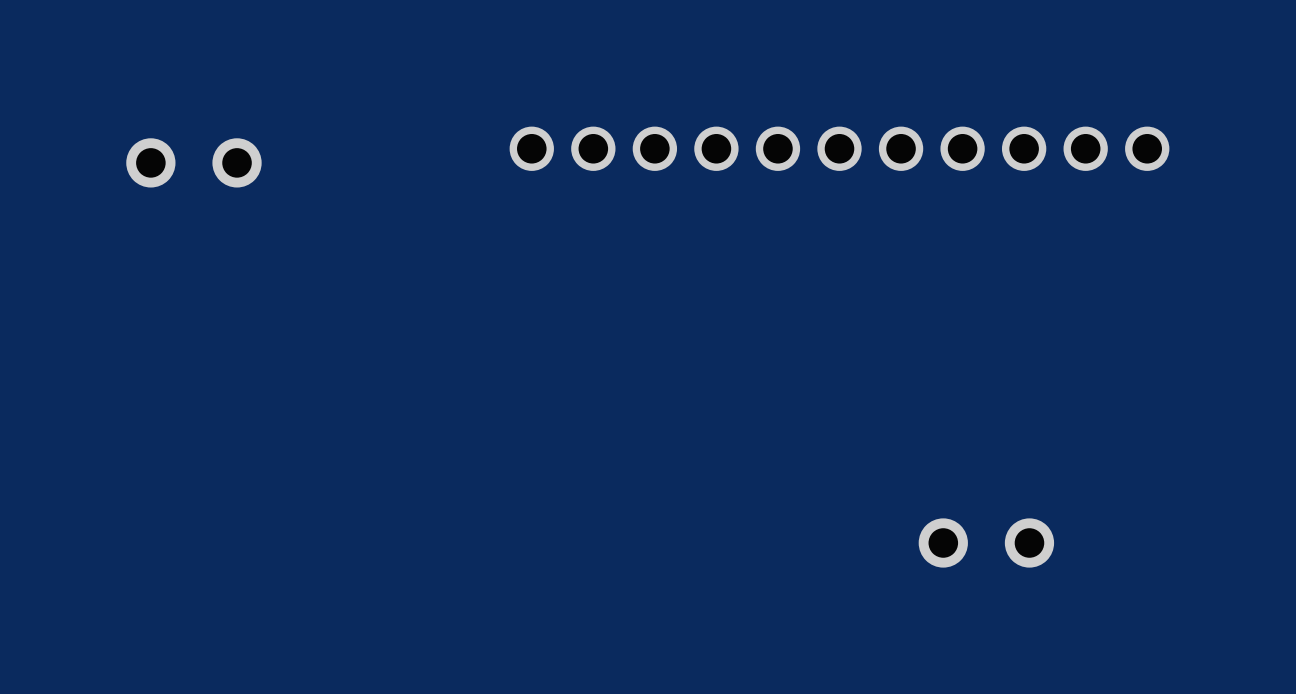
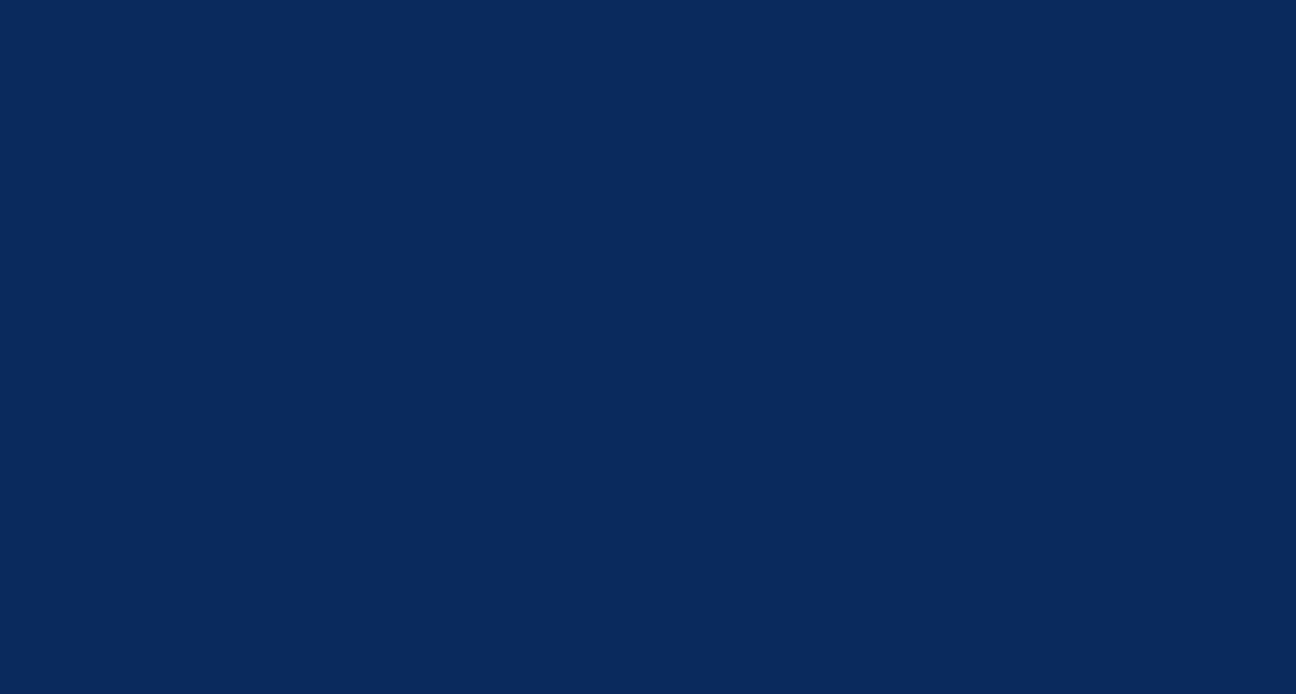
part: (839, 148) -> none
part: (193, 162) -> none
part: (986, 542) -> none

